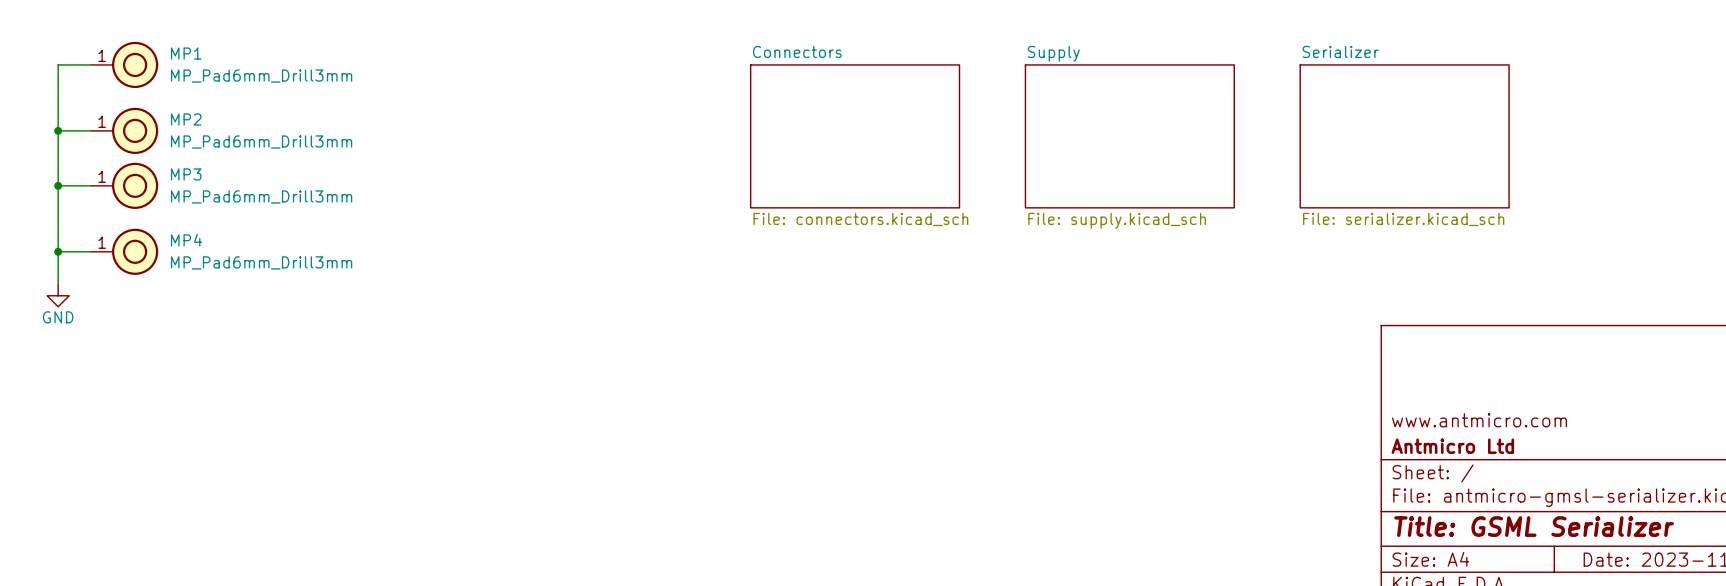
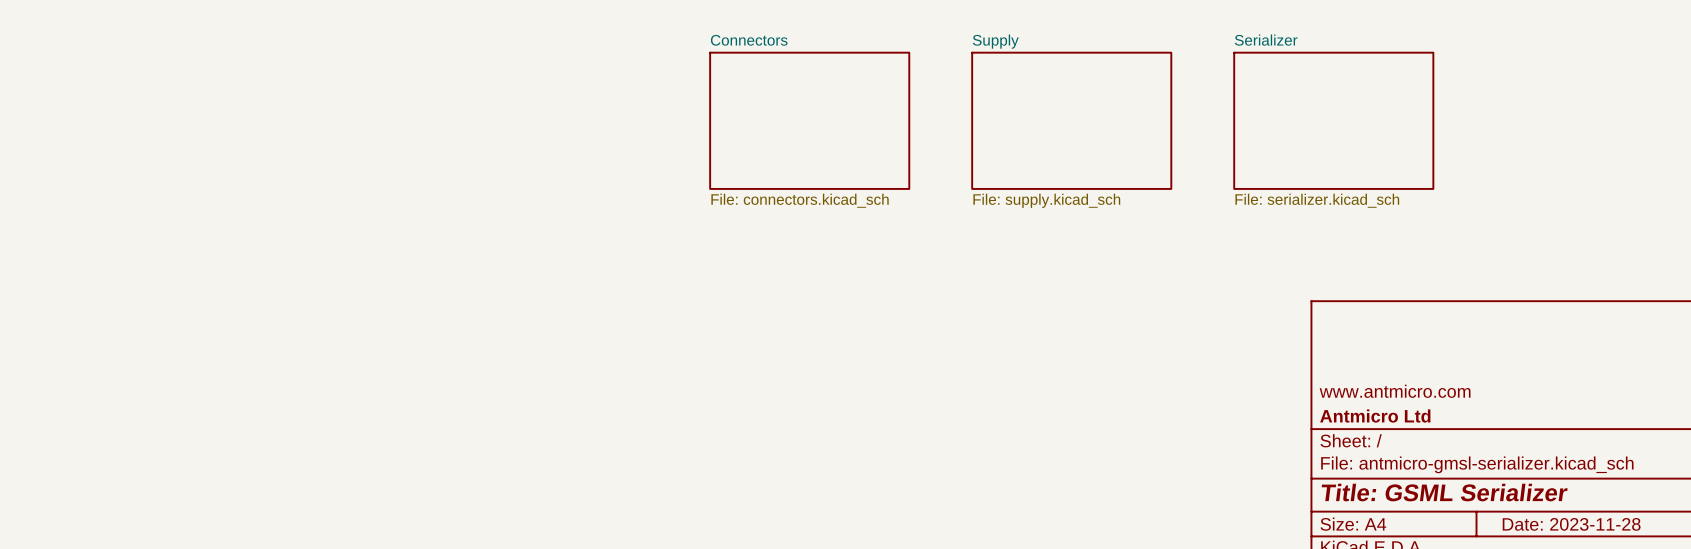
wire: (91, 64) (58, 64) (58, 284) -> none
MP1: MP_Pad6mm_Drill3mm (124, 64) -> none
wire: (58, 130) (91, 130) -> none
junction: (58, 130) -> none
MP2: MP_Pad6mm_Drill3mm (124, 130) -> none
wire: (58, 185) (91, 185) -> none
junction: (58, 185) -> none
MP3: MP_Pad6mm_Drill3mm (124, 185) -> none
wire: (58, 251) (91, 251) -> none
junction: (58, 251) -> none
MP4: MP_Pad6mm_Drill3mm (124, 251) -> none
power symbol: GND (58, 295) -> none

